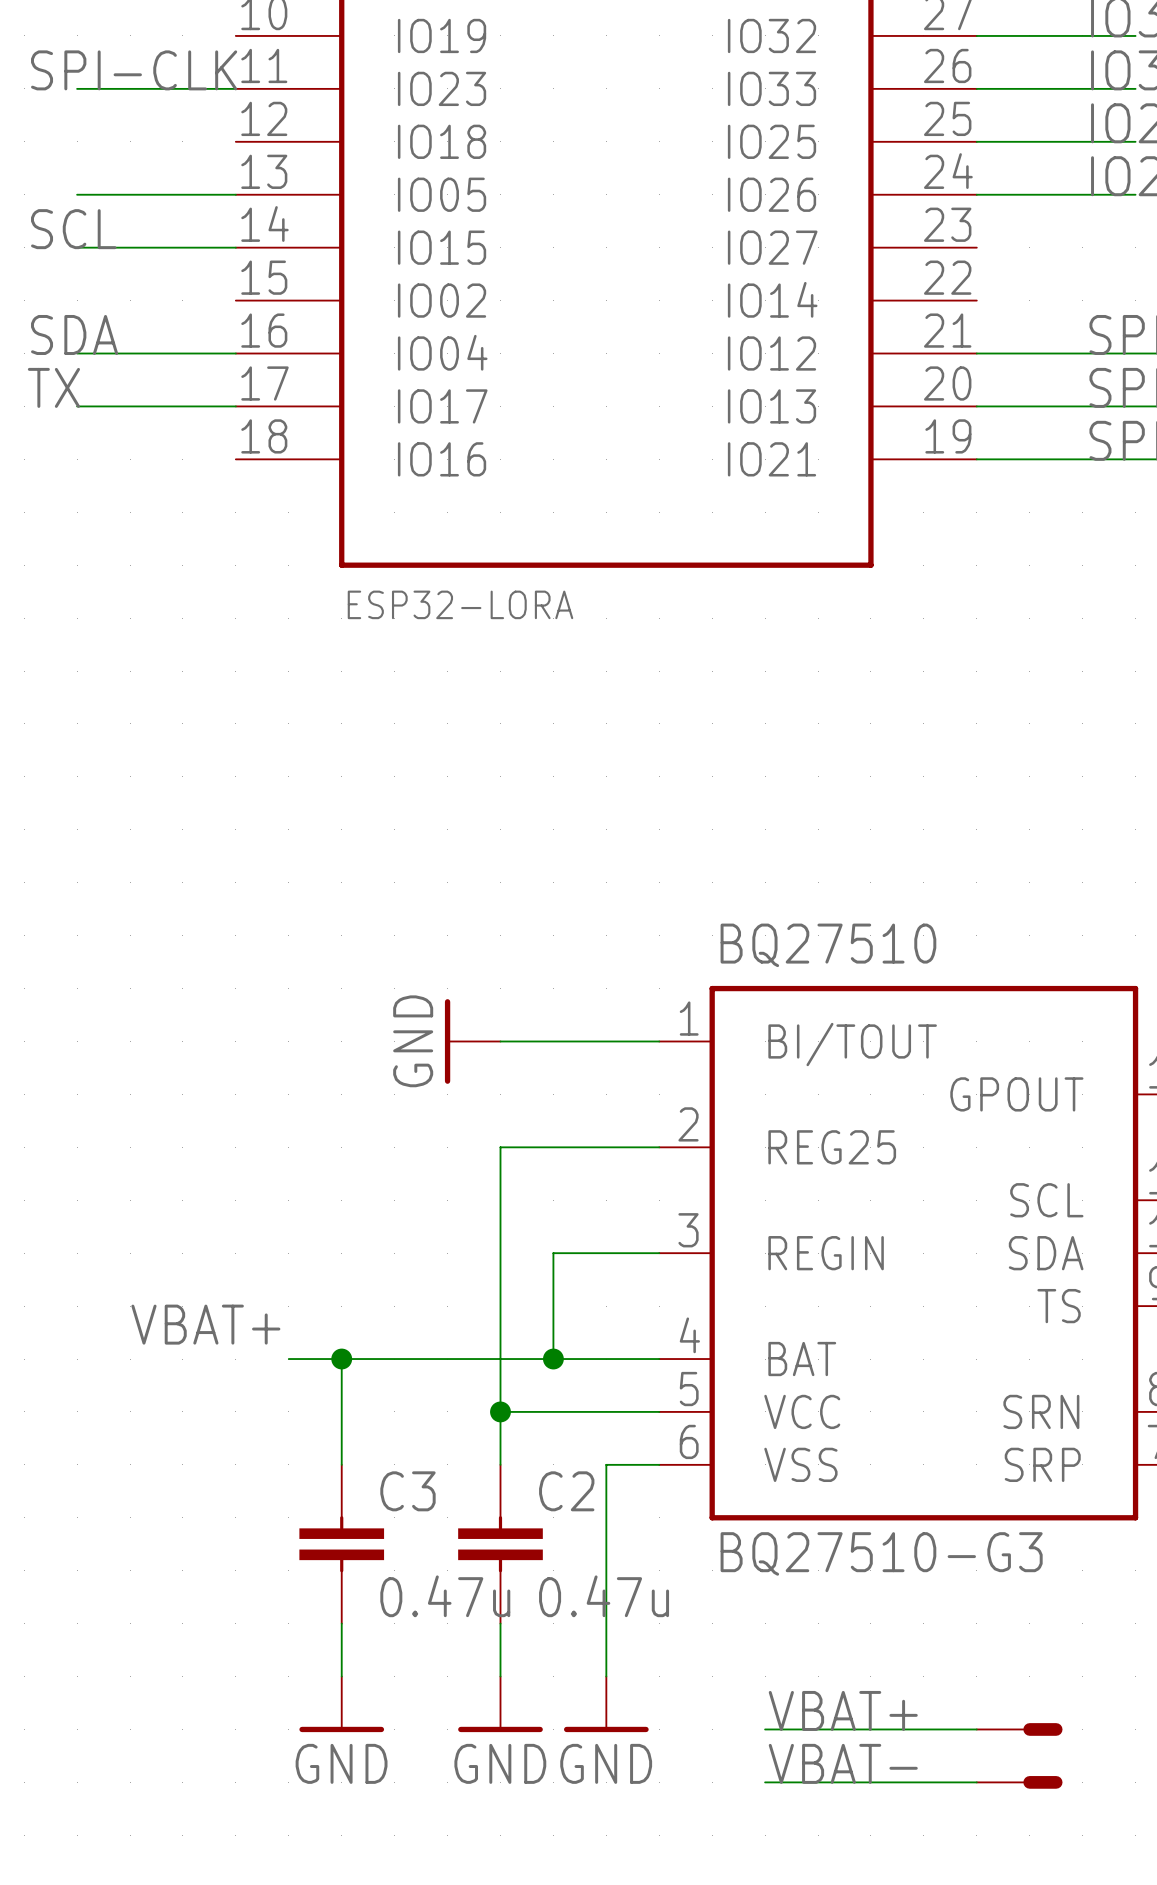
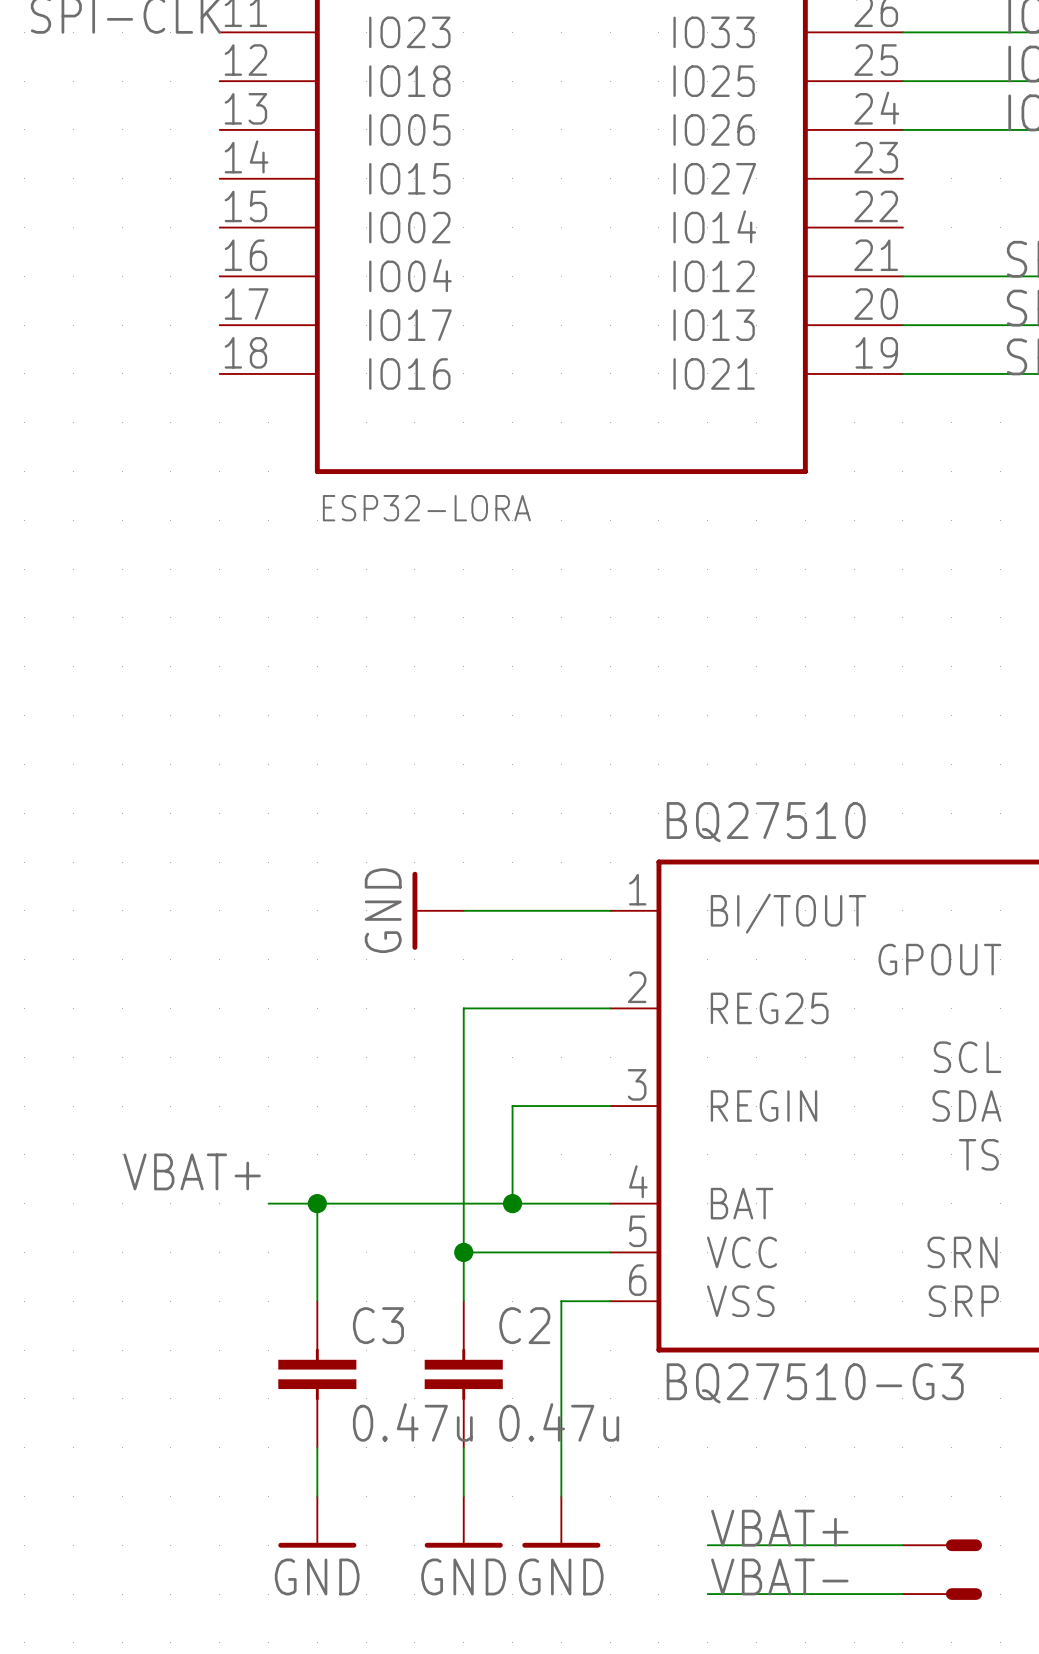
wire: (77, 88) (235, 88) -> none
wire: (77, 194) (235, 194) -> none
label: SCL (73, 229) -> none
wire: (77, 247) (235, 247) -> none
label: SDA (74, 334) -> none
wire: (77, 353) (235, 353) -> none
label: TX (53, 387) -> none
wire: (77, 406) (235, 406) -> none

